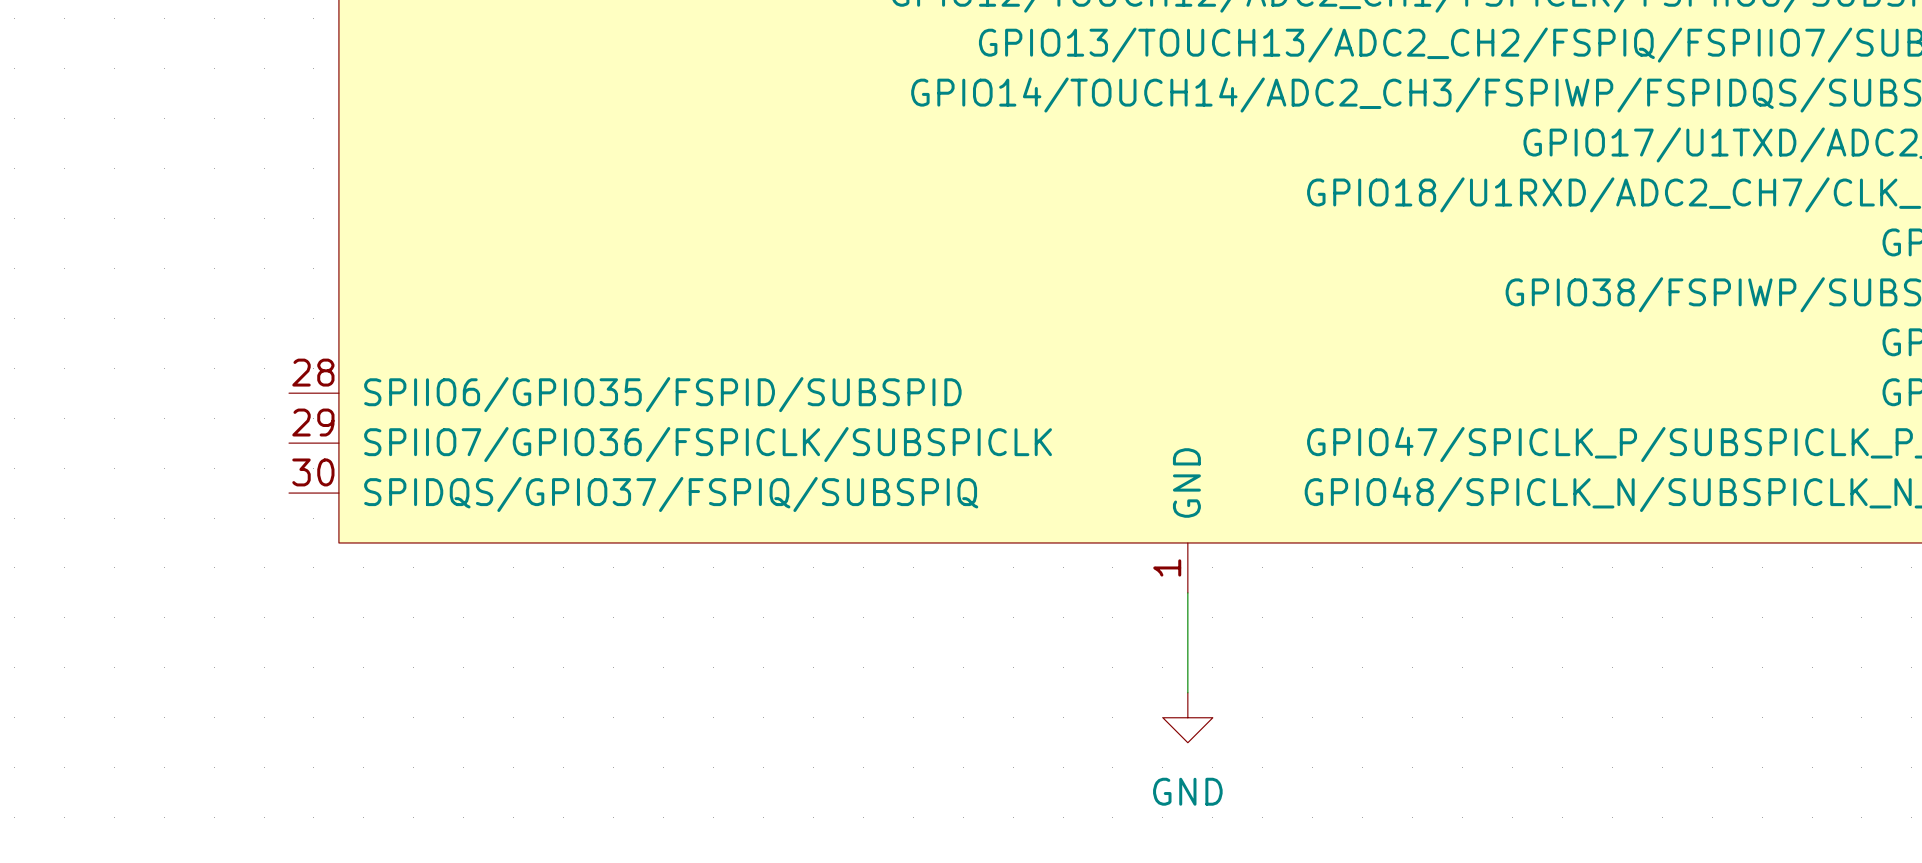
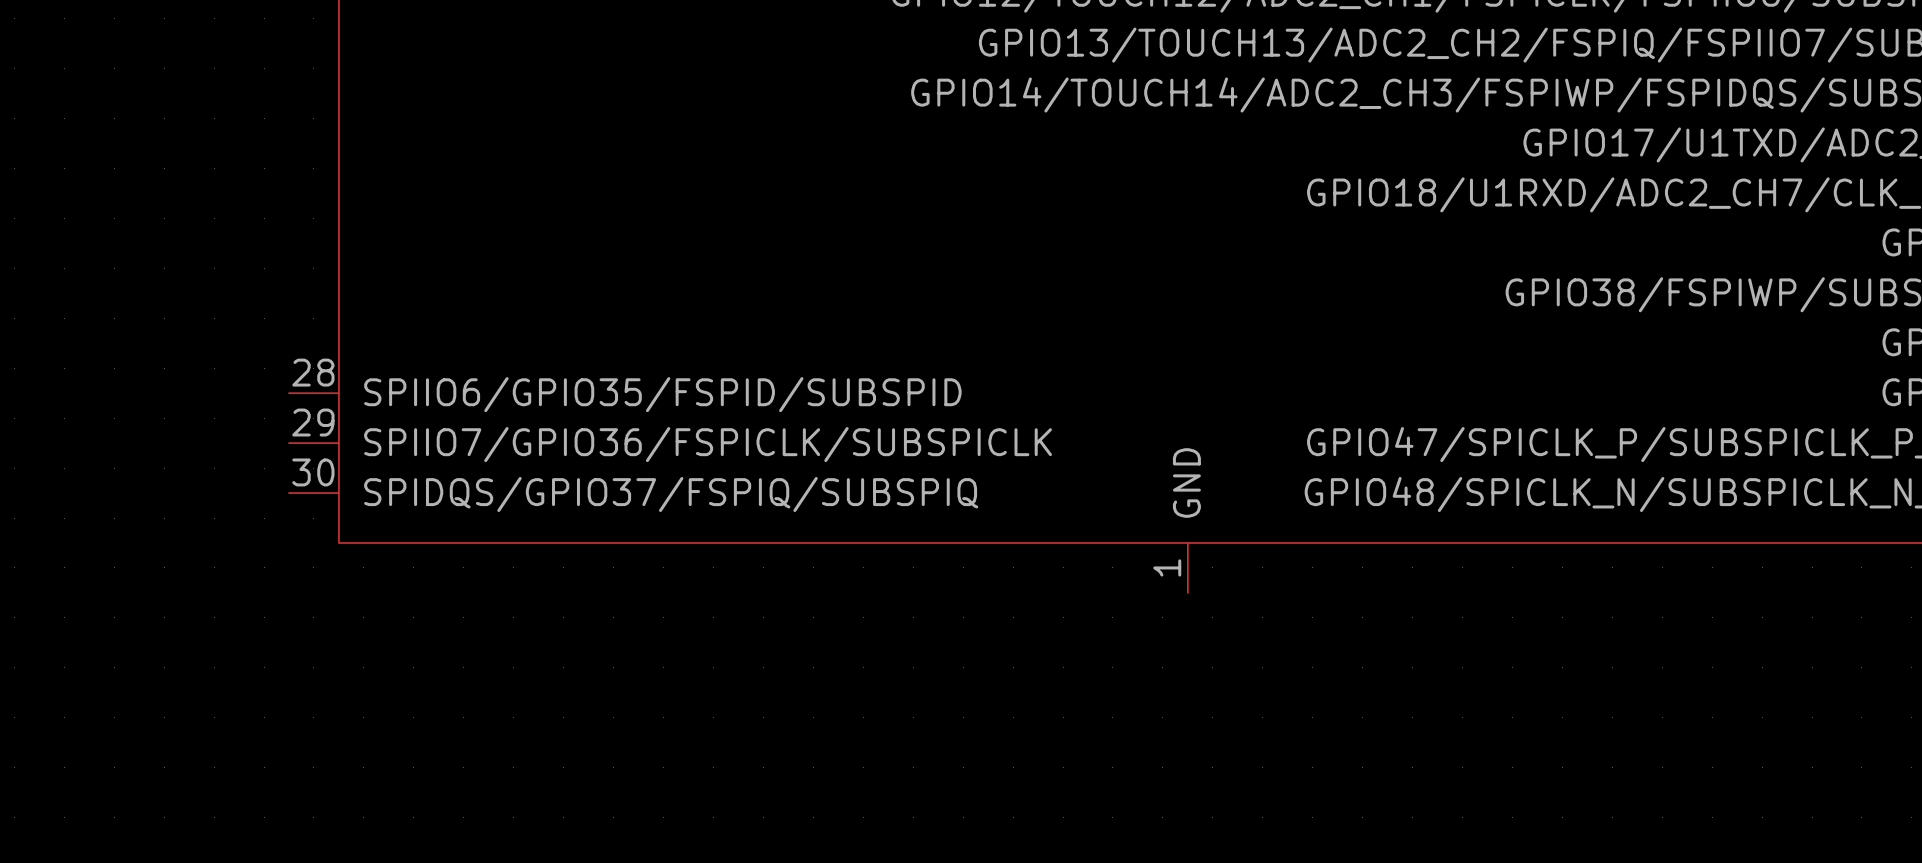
wire: (1187, 592) (1187, 692) -> none
power symbol: GND (1187, 717) -> none

